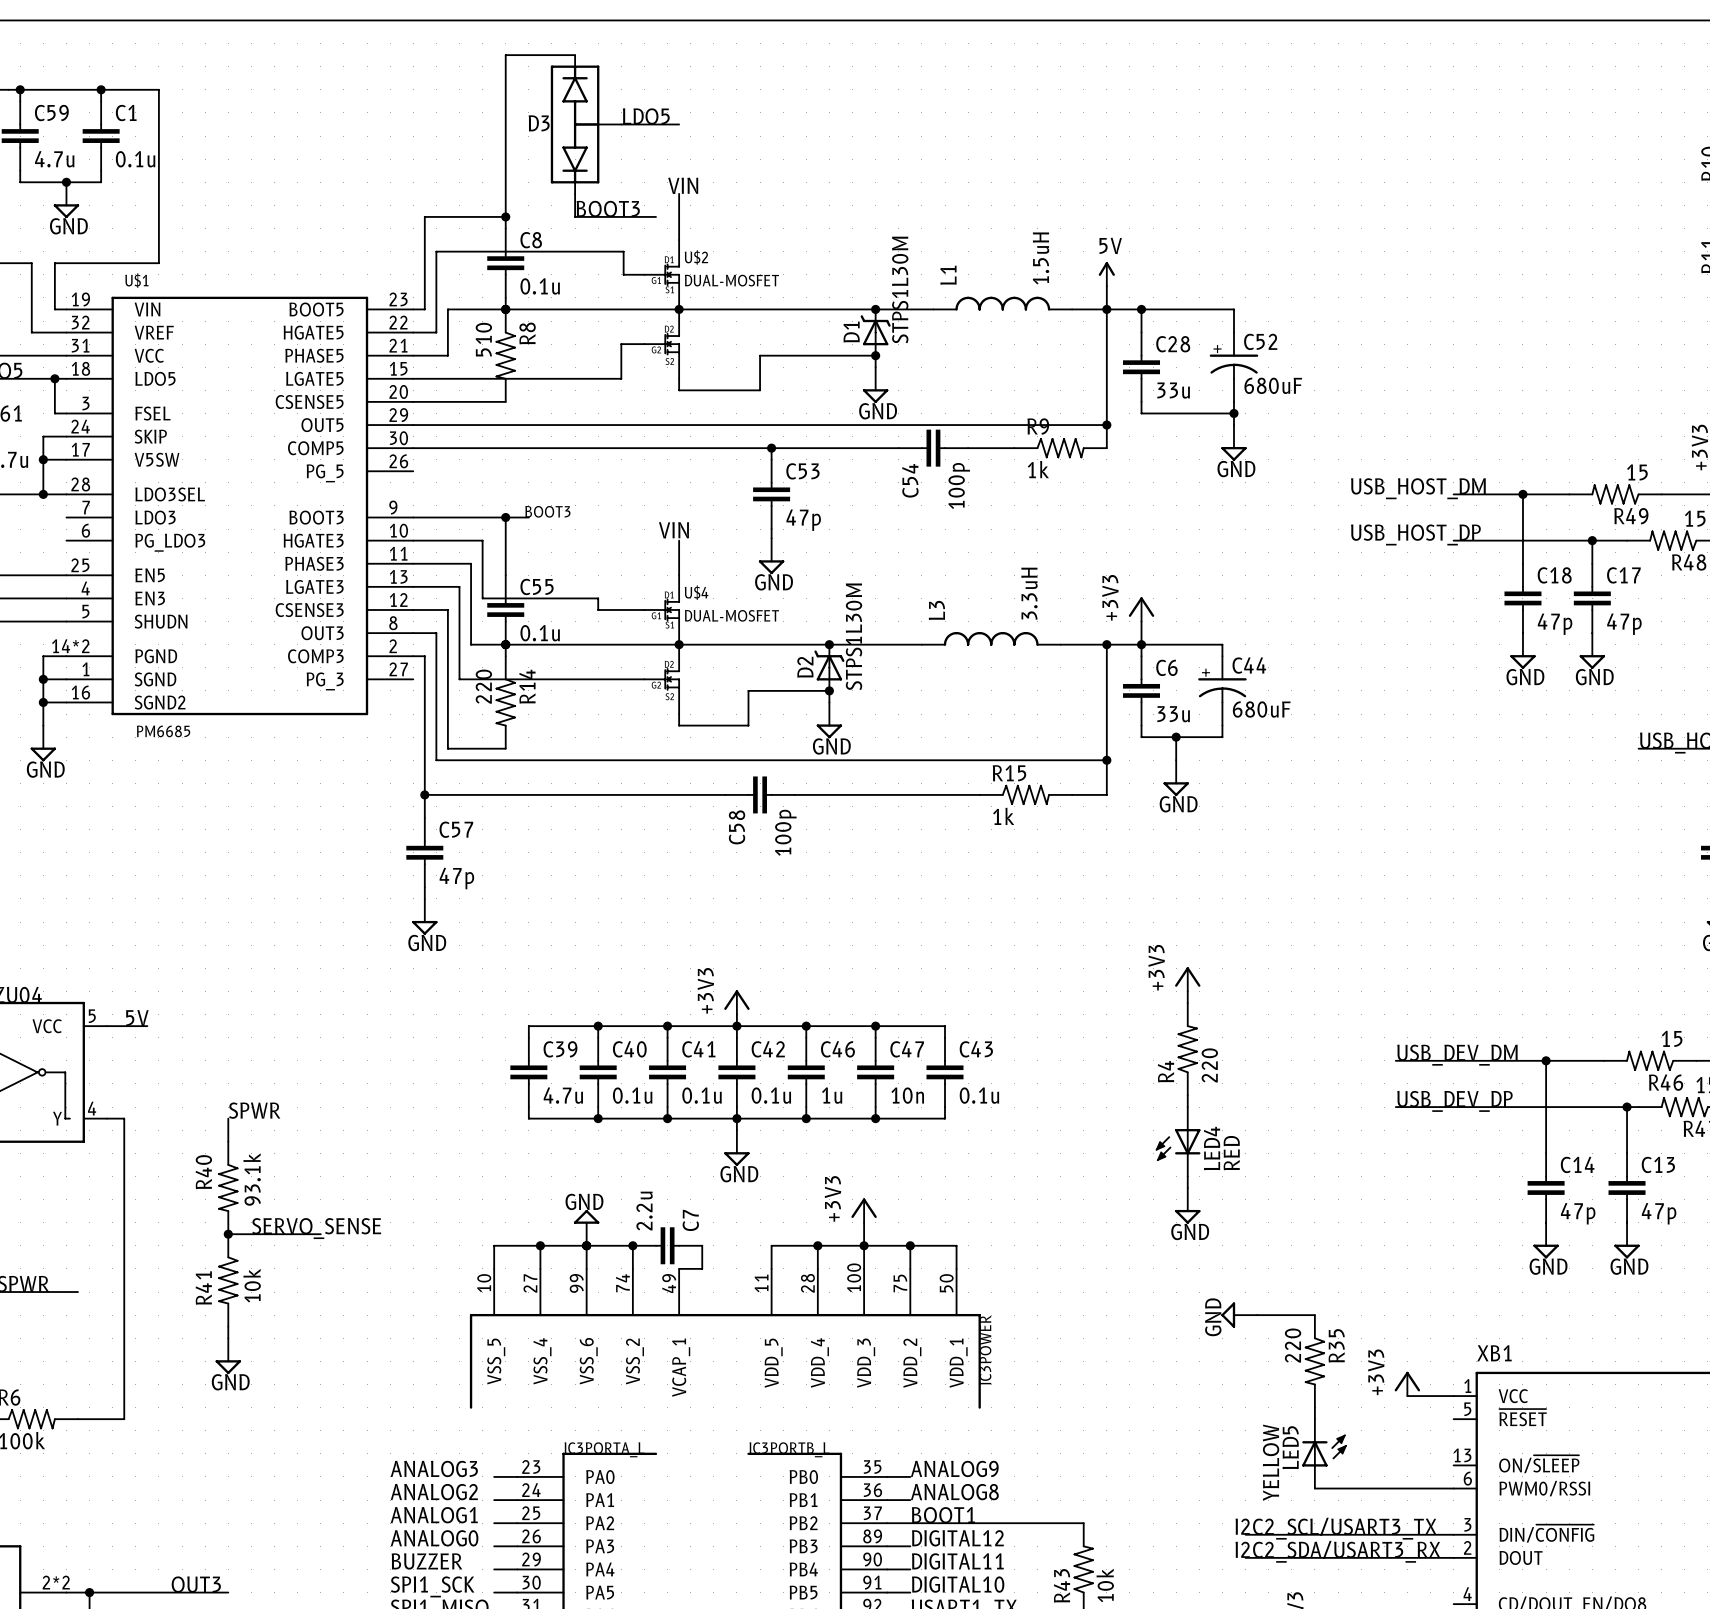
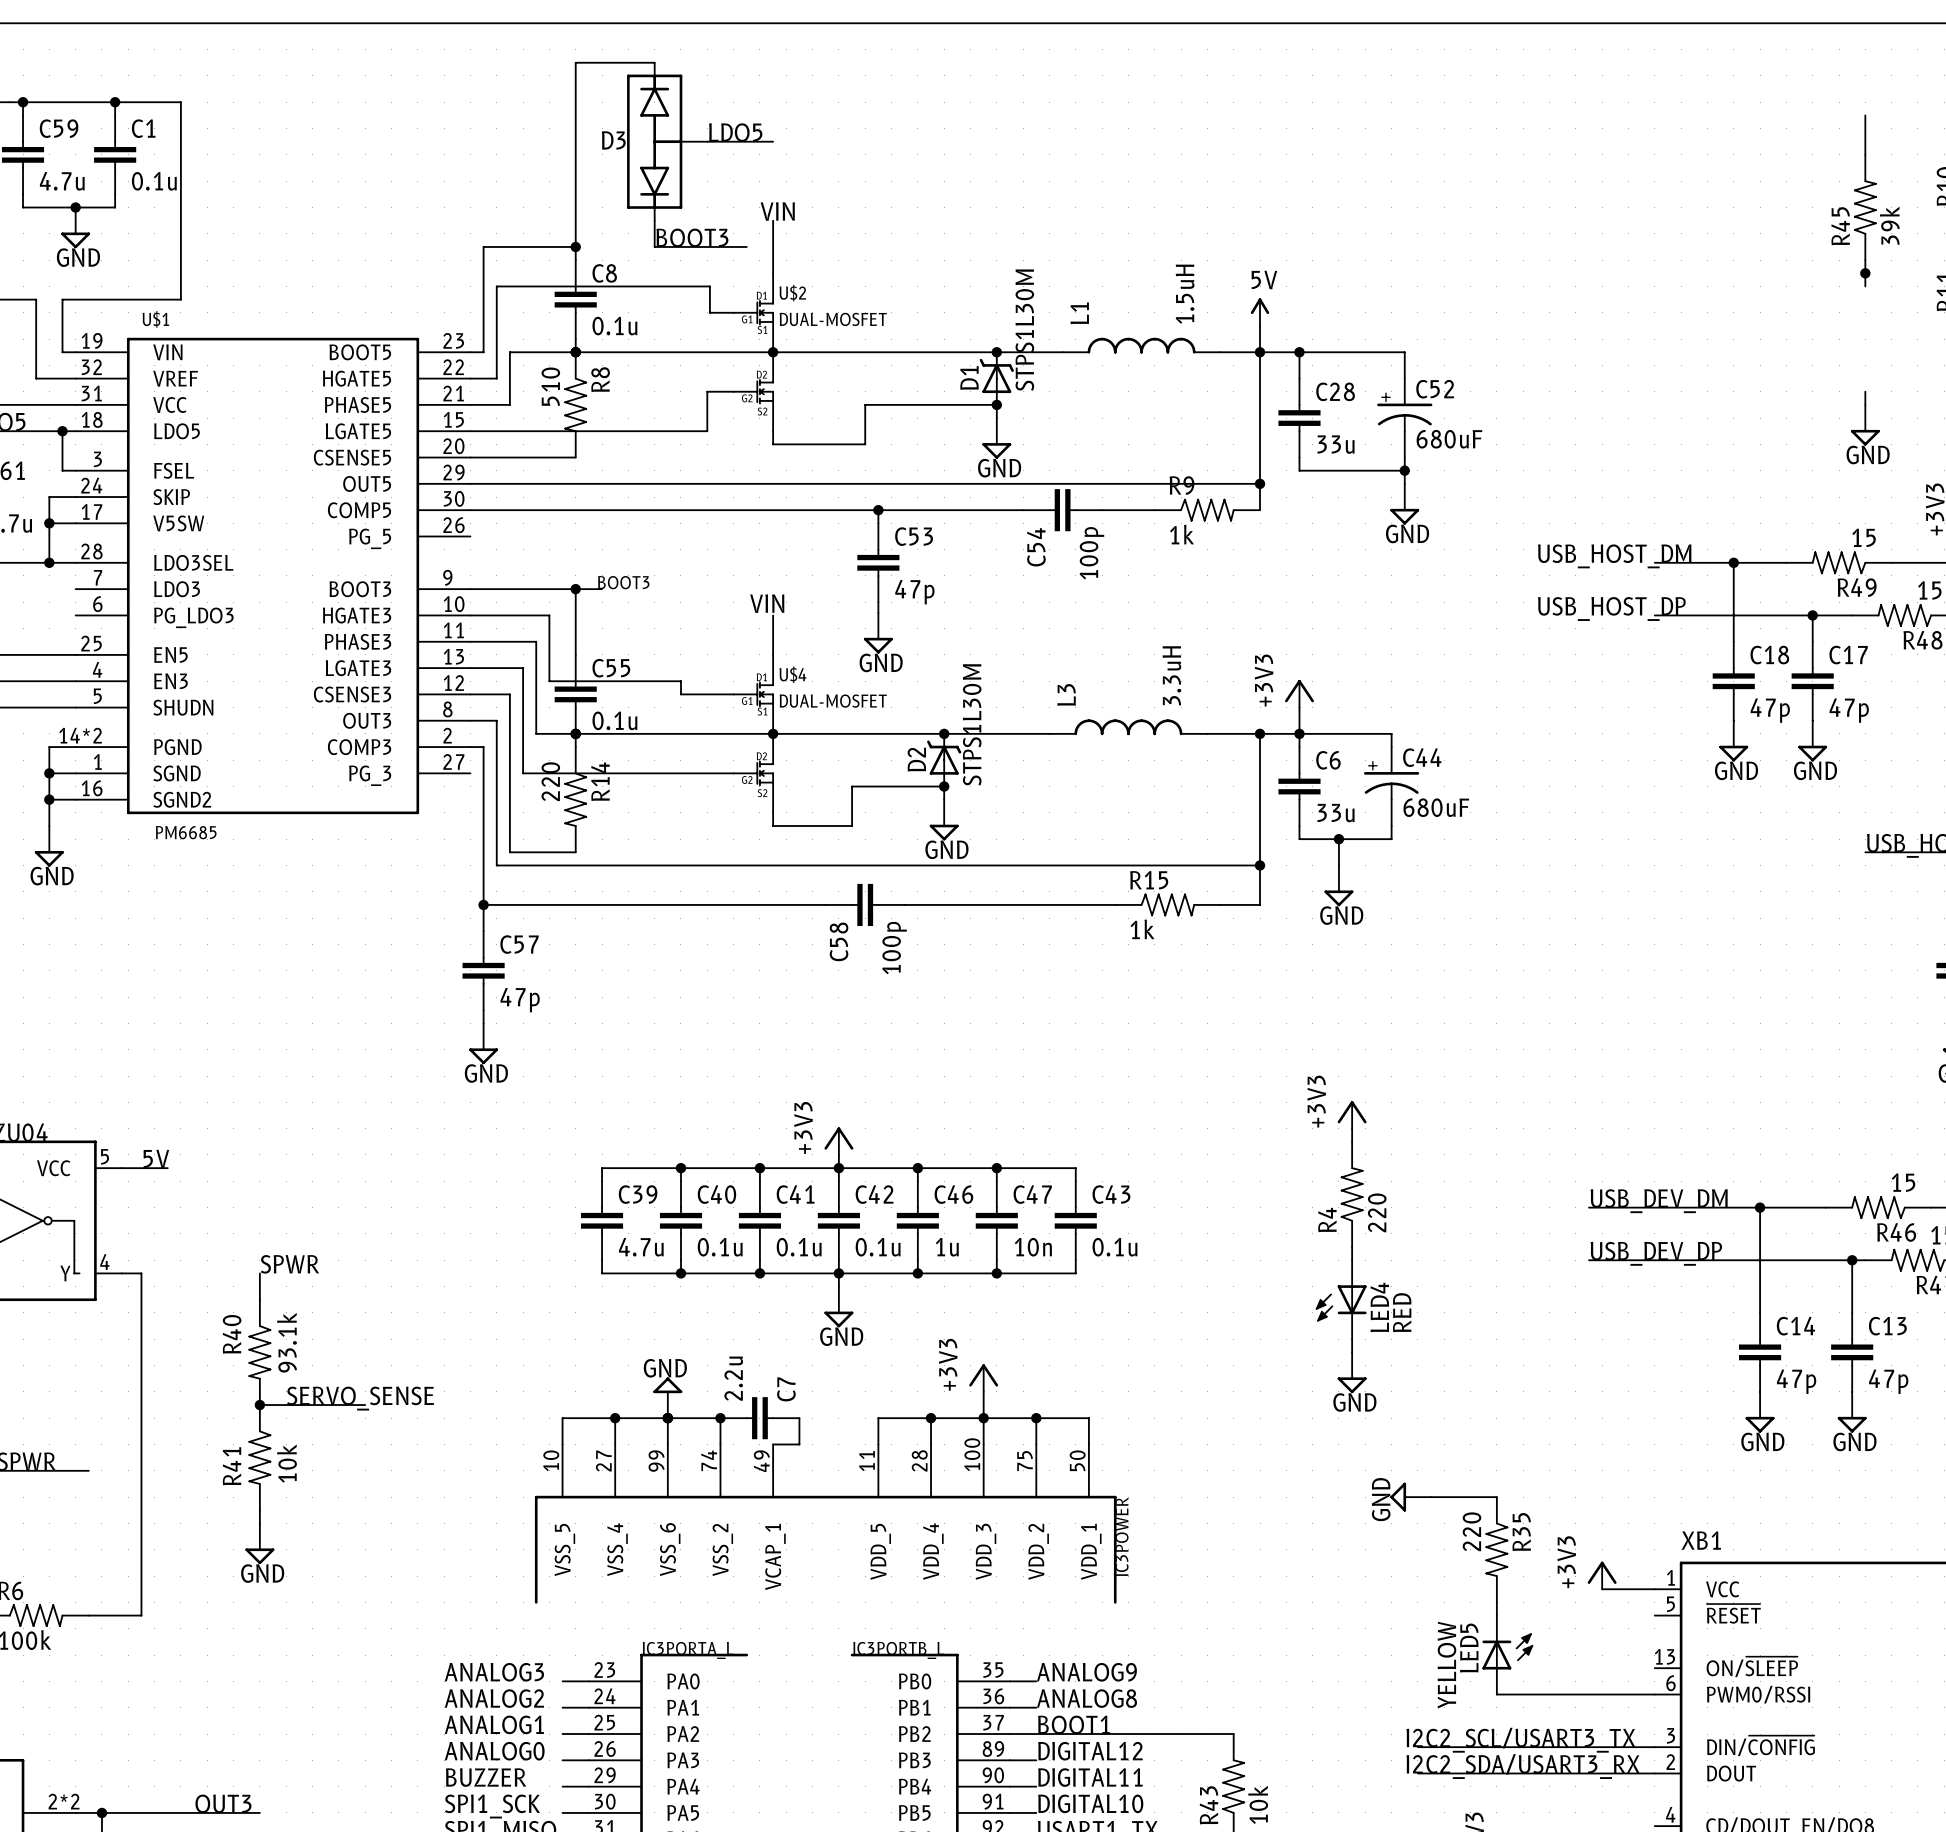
wire: none -> (1865, 115) (1865, 154)
R45: none -> 39k (1865, 207)
wire: none -> (1865, 260) (1865, 286)
junction: none -> (1865, 273)
wire: none -> (1865, 391) (1865, 404)
power symbol: none -> GND (1865, 425)

